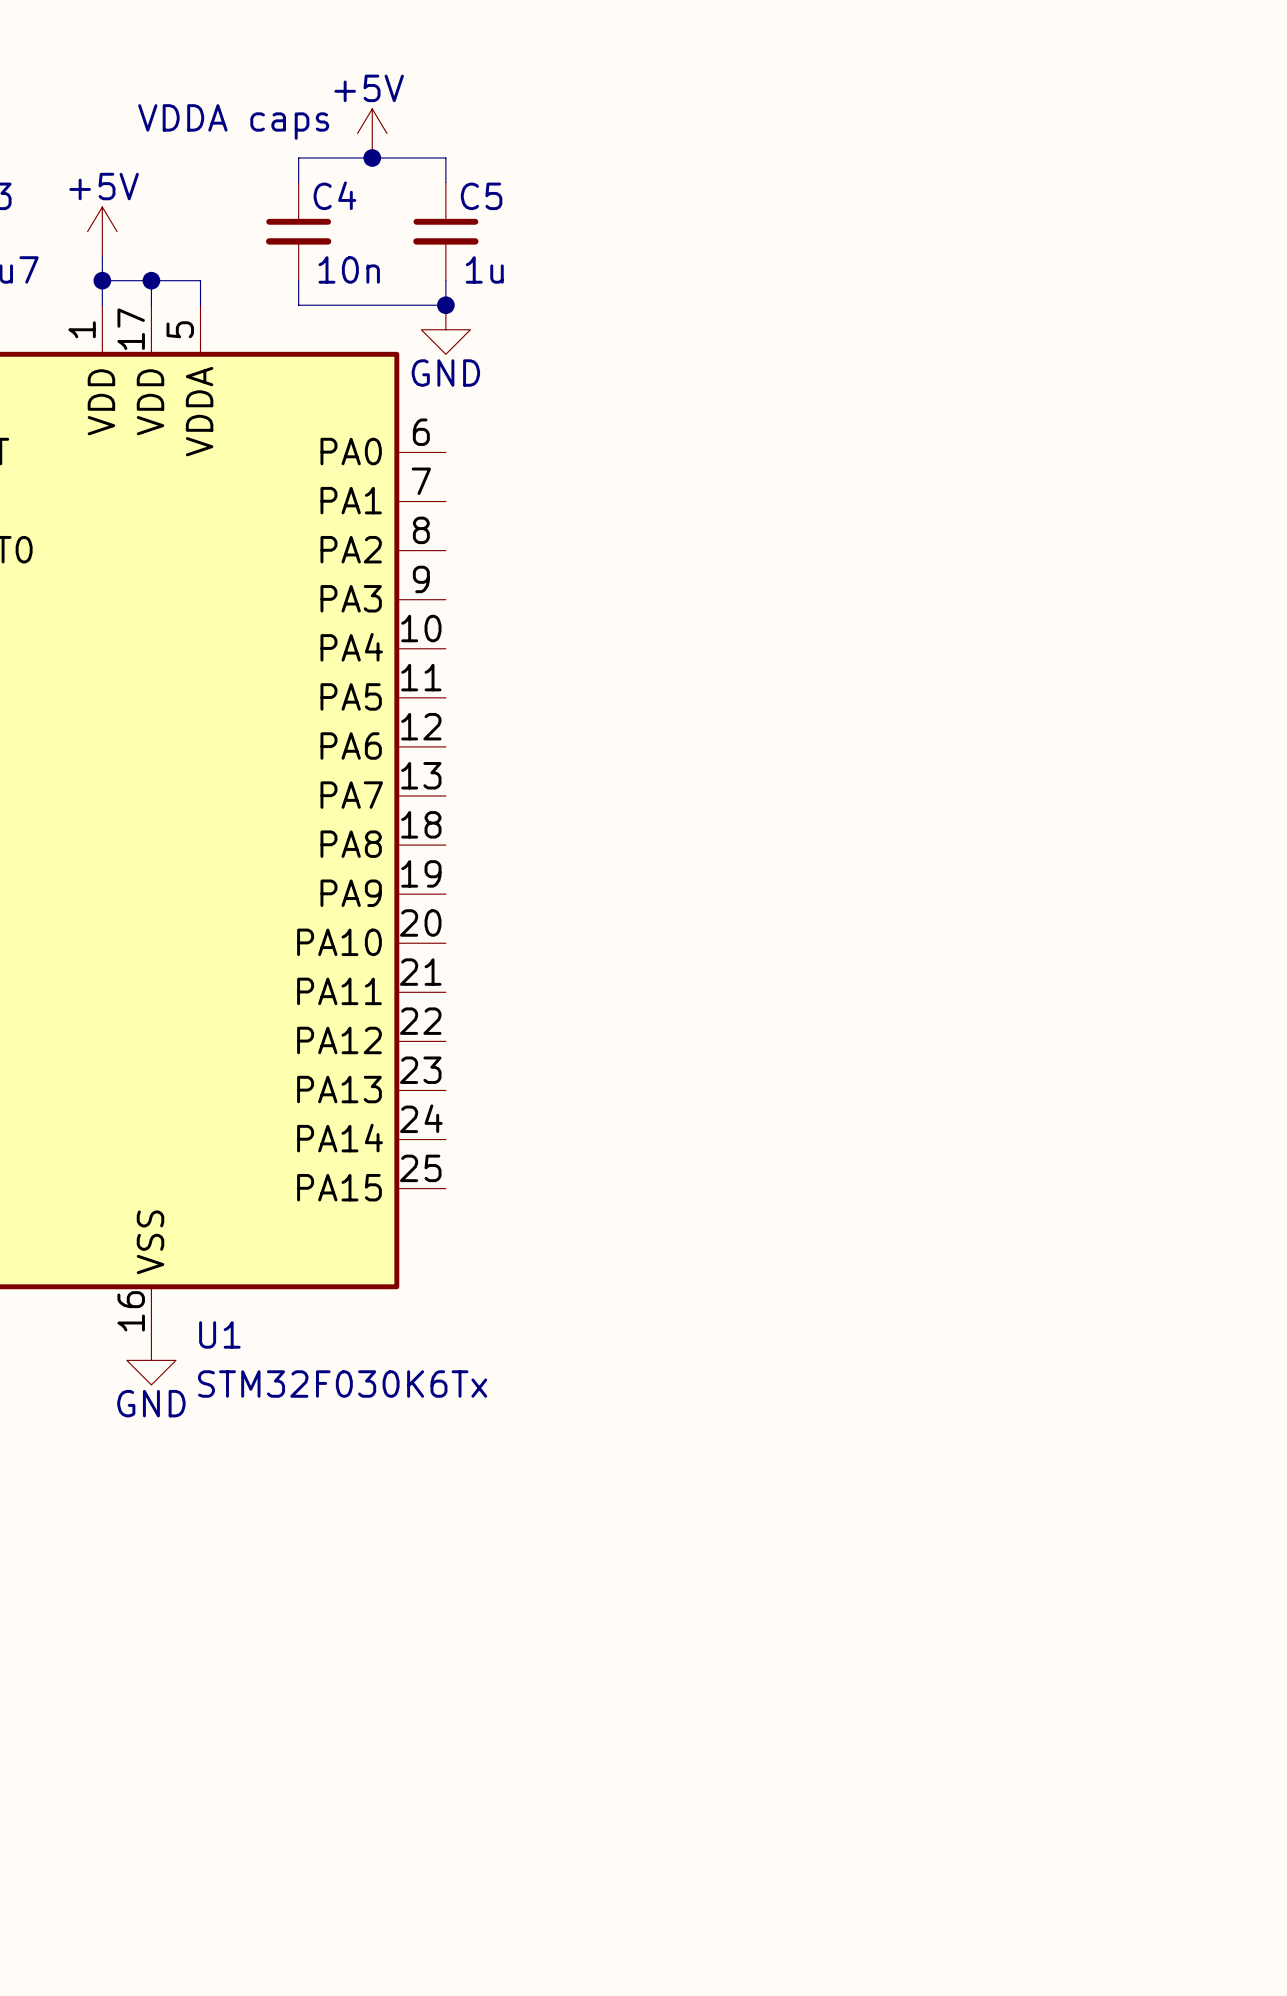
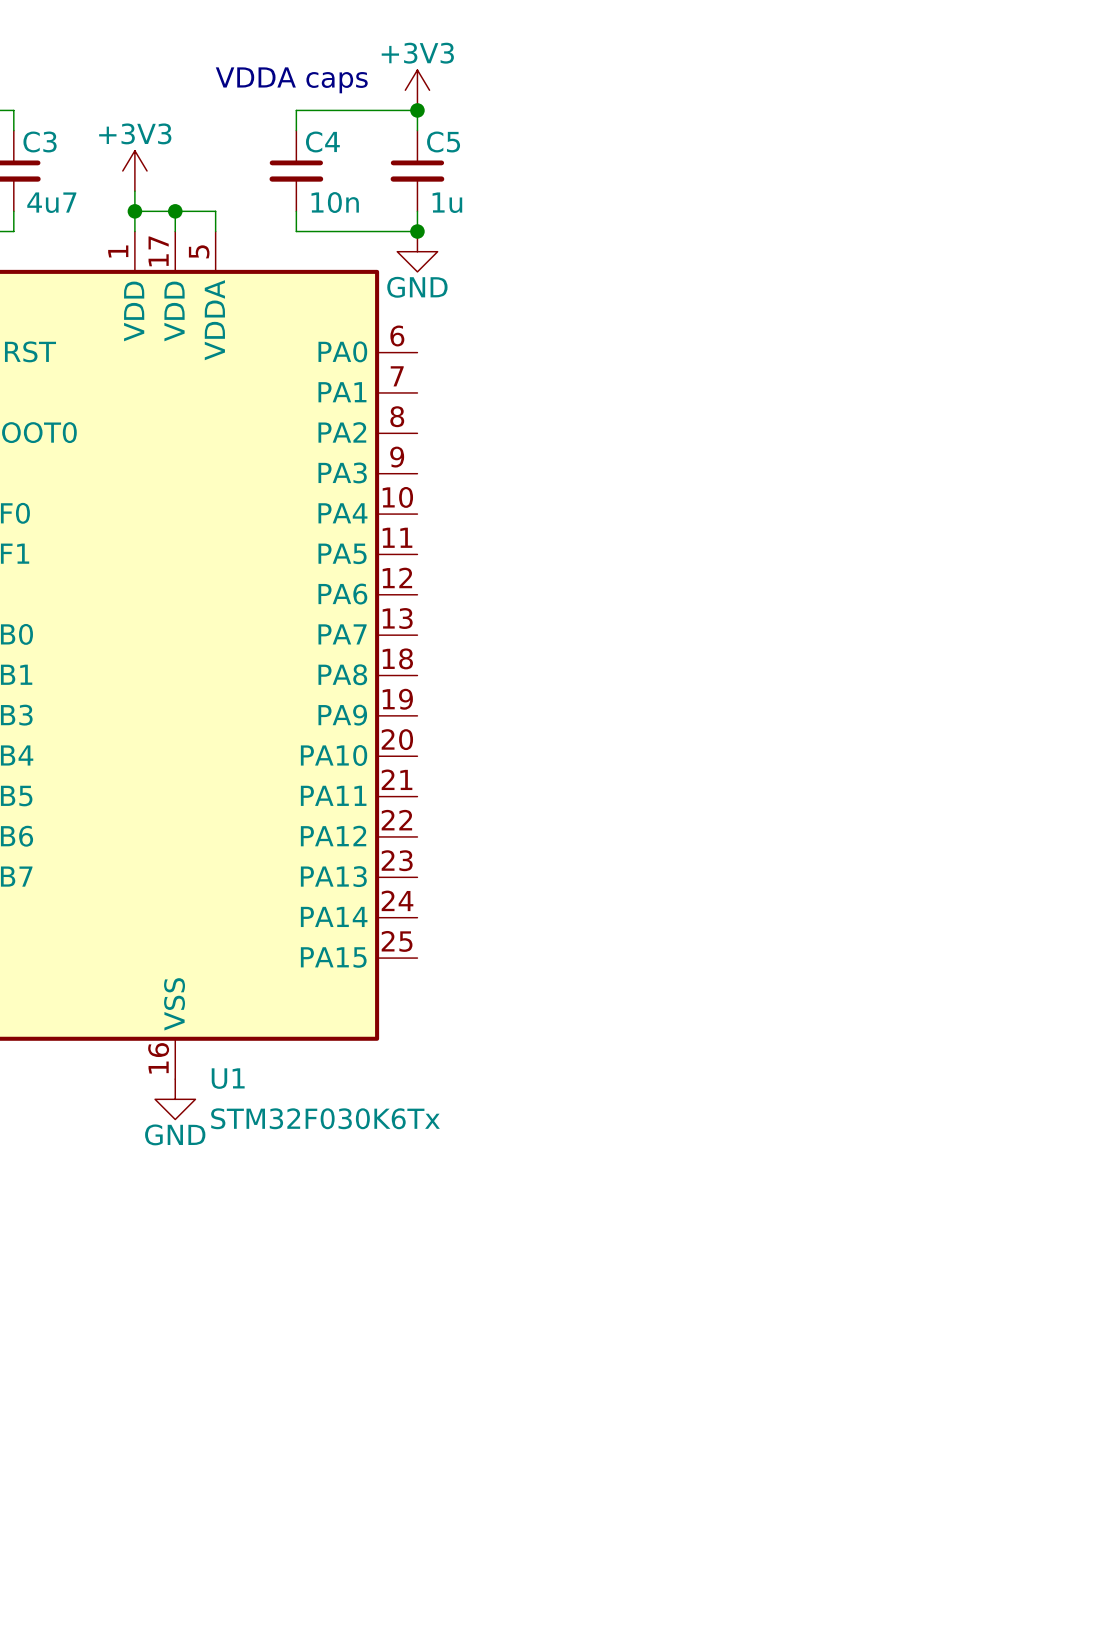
text position: VDDA caps (233, 121) -> VDDA caps (291, 80)
power symbol: +5V (372, 133) -> none
power symbol: none -> +3V3 (417, 90)
junction position: (372, 158) -> (417, 110)
power symbol: +5V (102, 231) -> +3V3 (134, 170)

